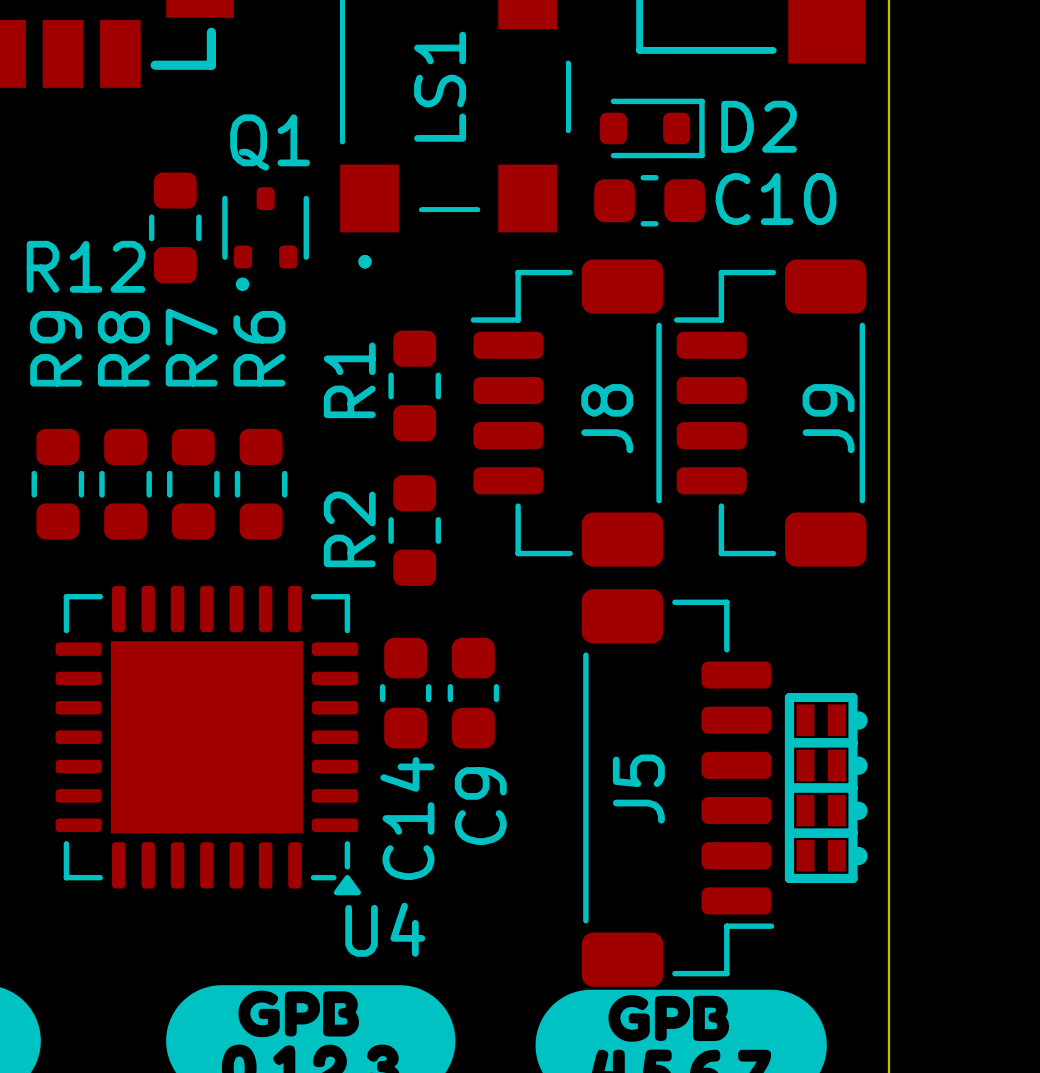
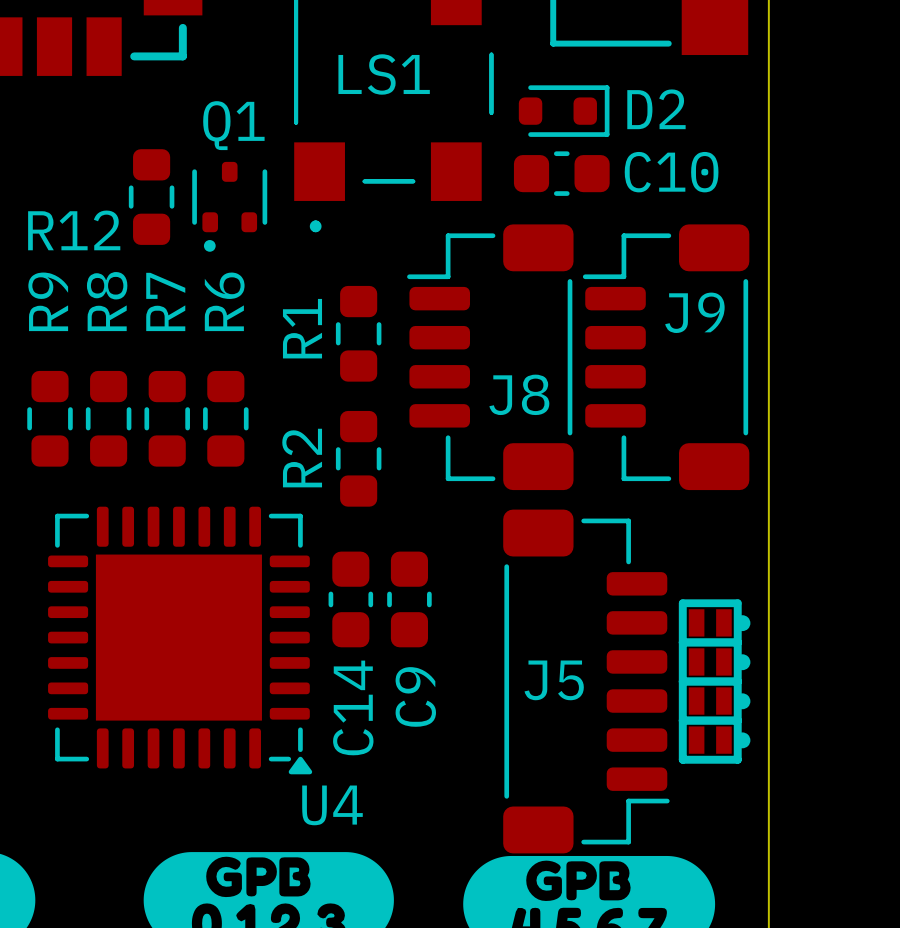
LS1 name rotation: 0° (440, 86) -> 90° clockwise (384, 74)
J8 name rotation: 0° (607, 418) -> 90° clockwise (519, 394)
J9 name rotation: 0° (828, 418) -> 90° clockwise (694, 312)
J5 name rotation: 0° (638, 789) -> 90° clockwise (554, 680)

